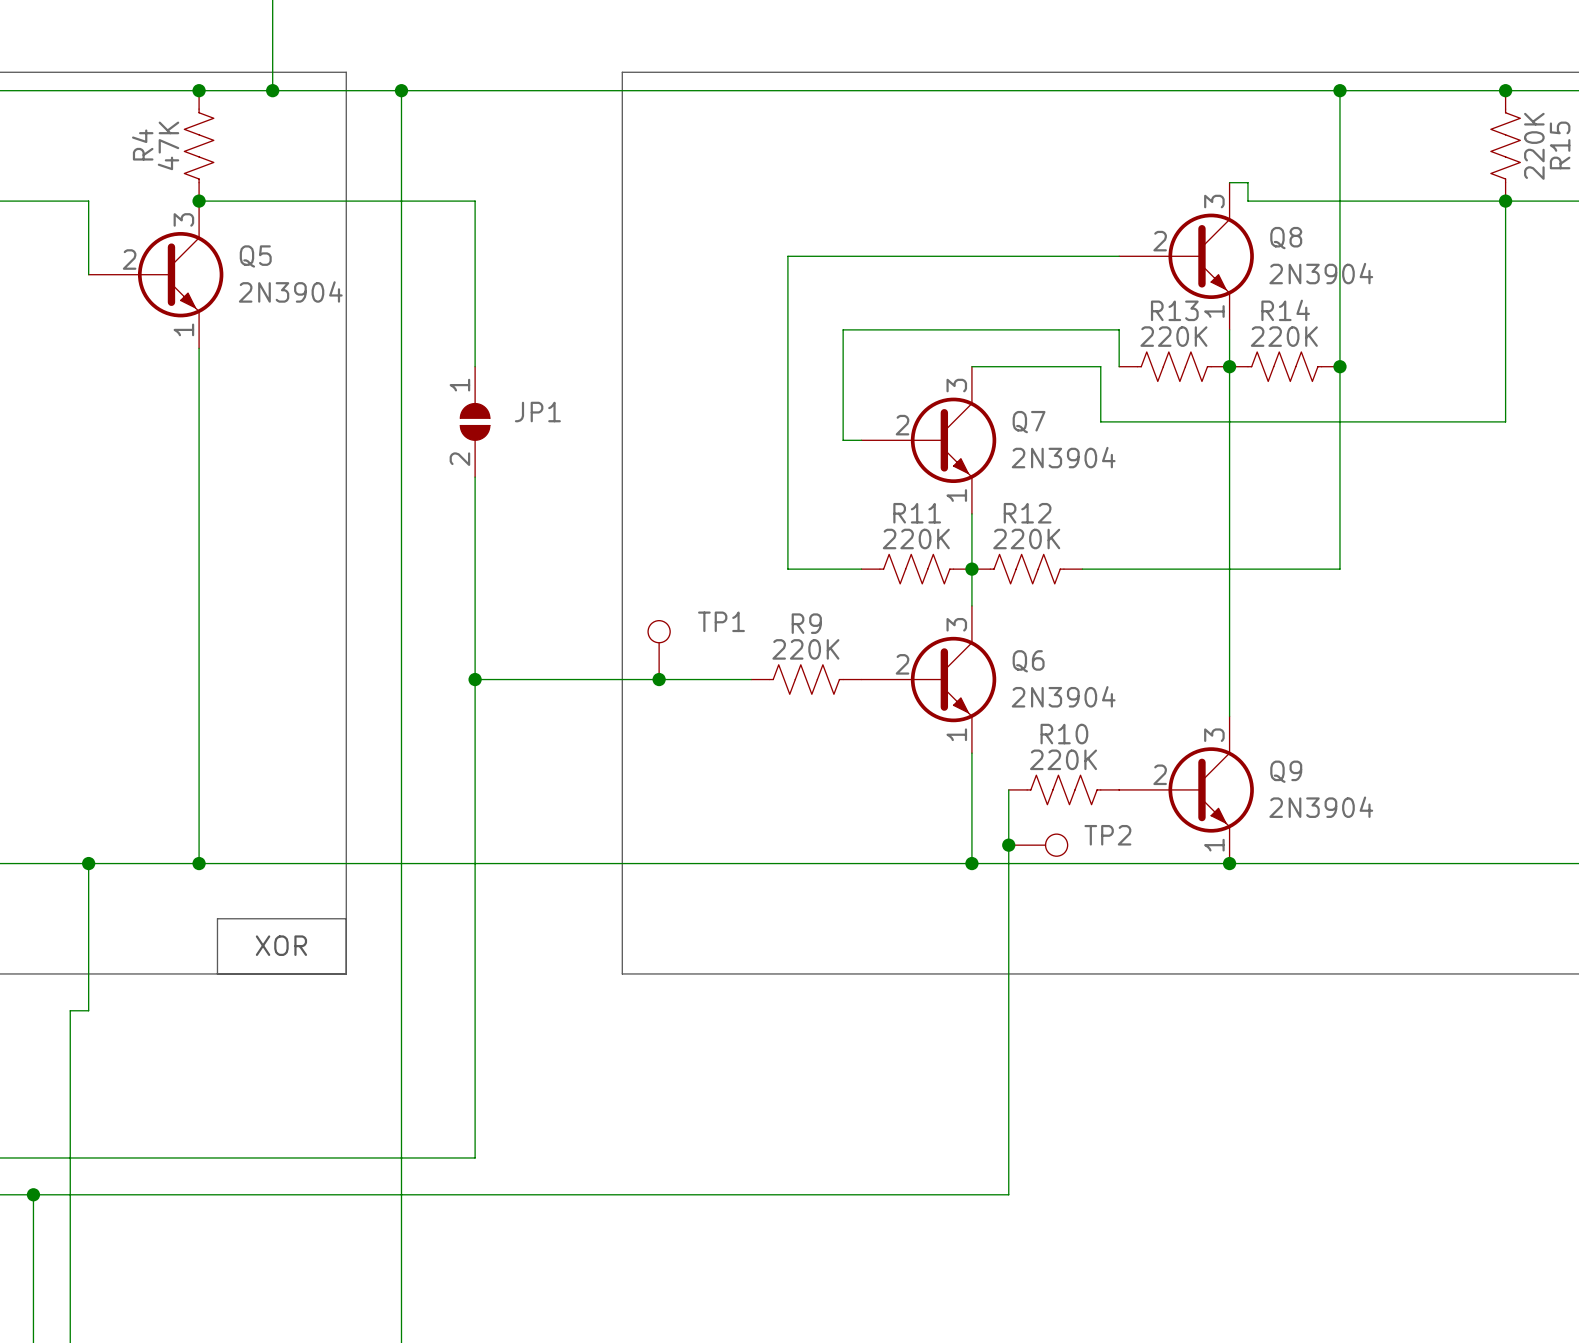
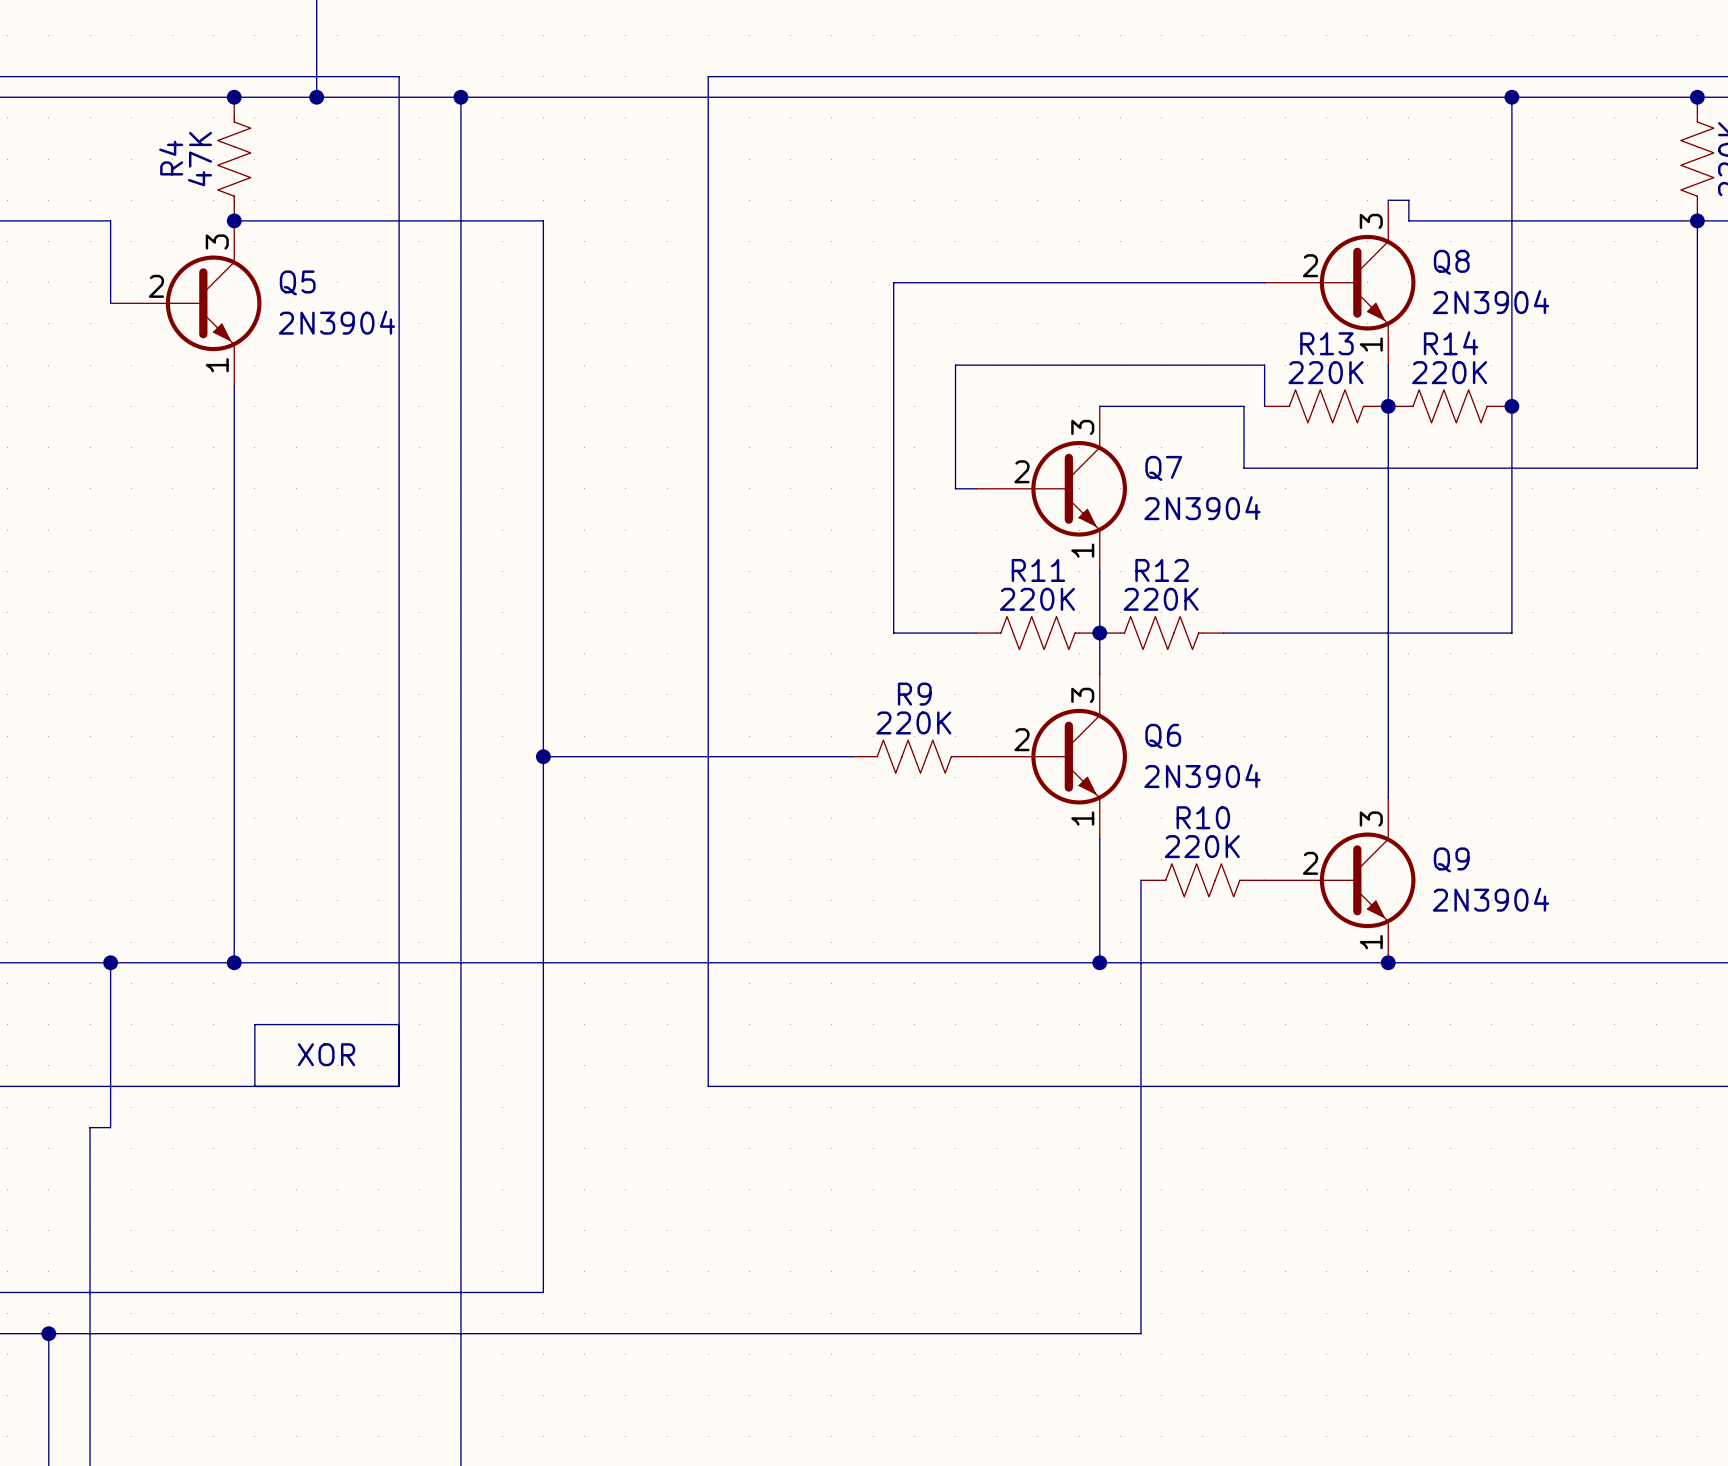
JP1: (475, 421) -> none
TP1: (659, 650) -> none
junction: (659, 679) -> none
junction: (1008, 845) -> none
TP2: (1038, 845) -> none

